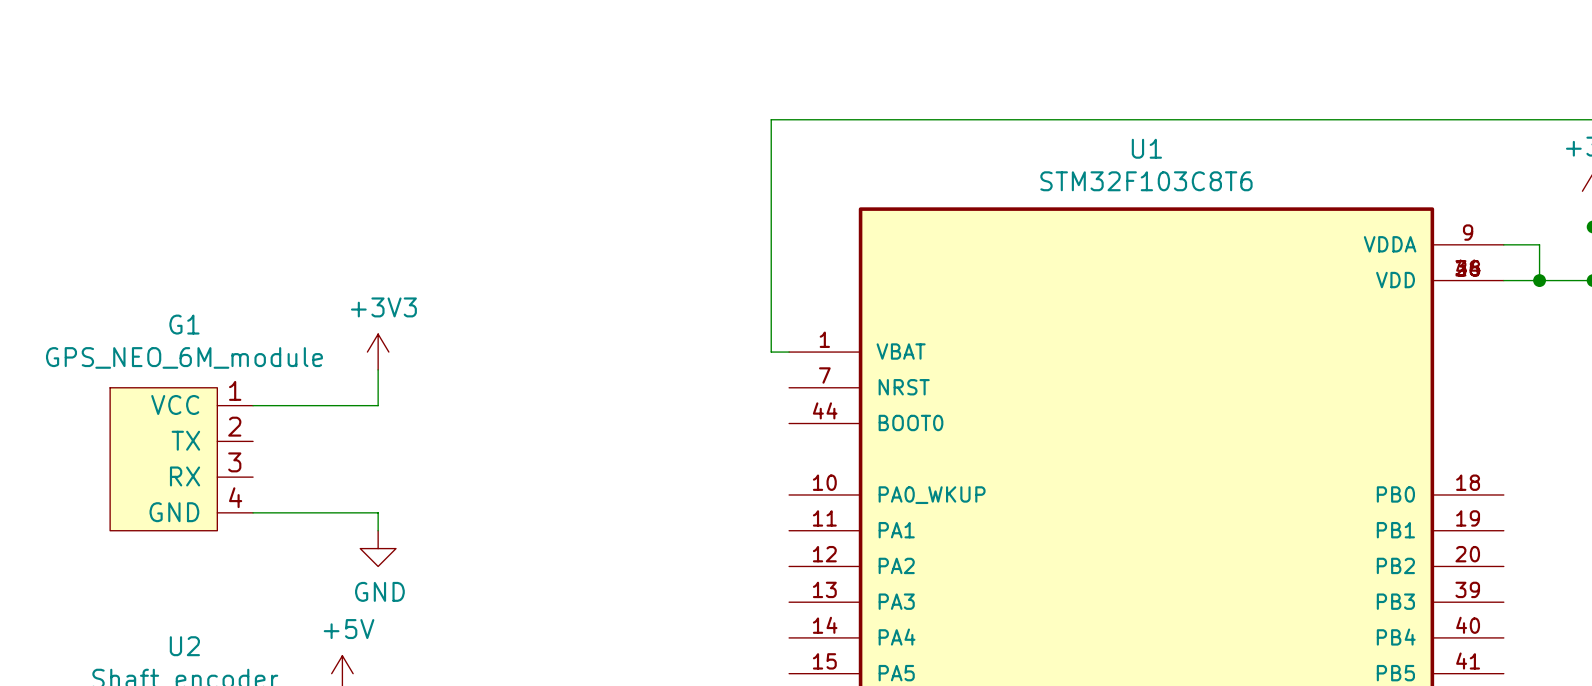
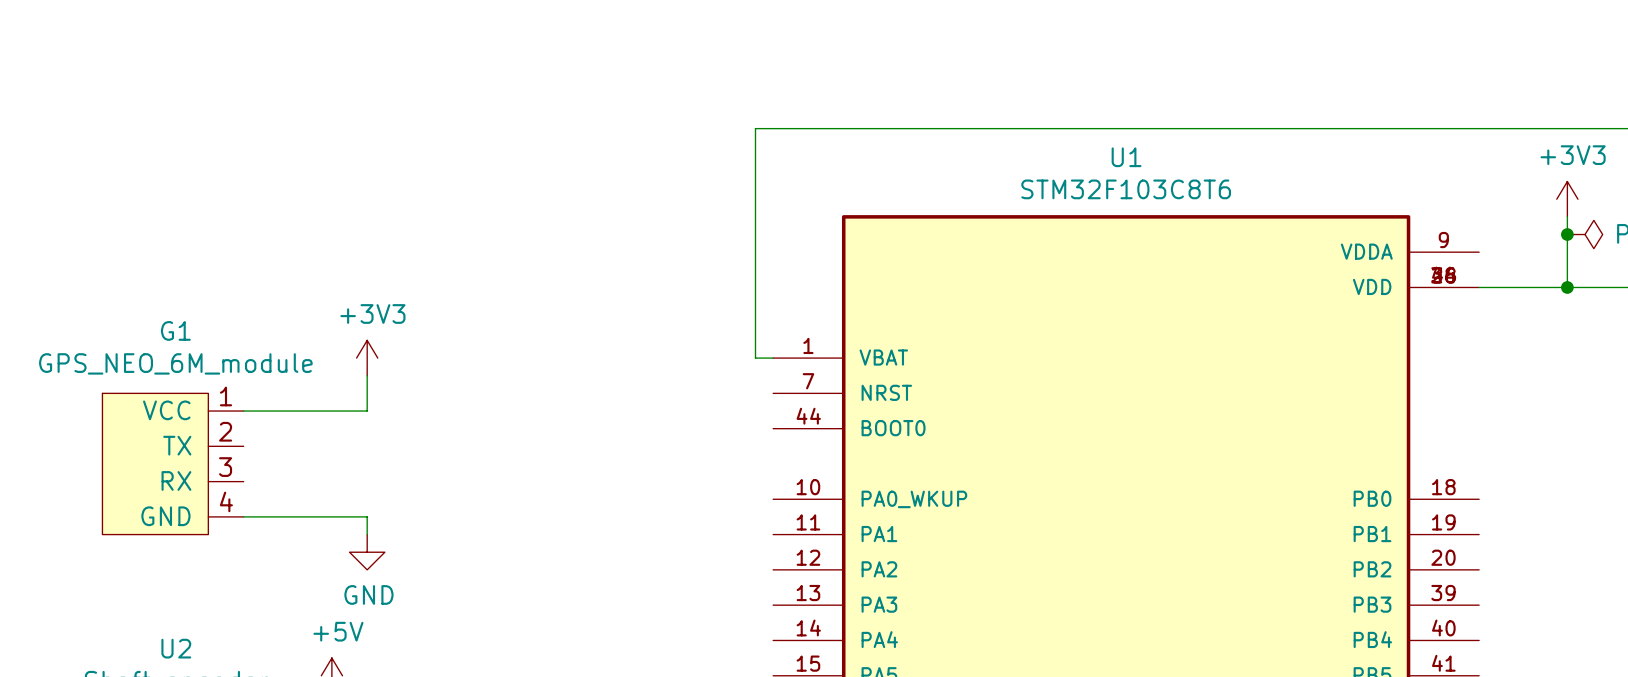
wire: (1503, 244) (1539, 244) (1539, 280) -> none
junction: (1539, 280) -> none

